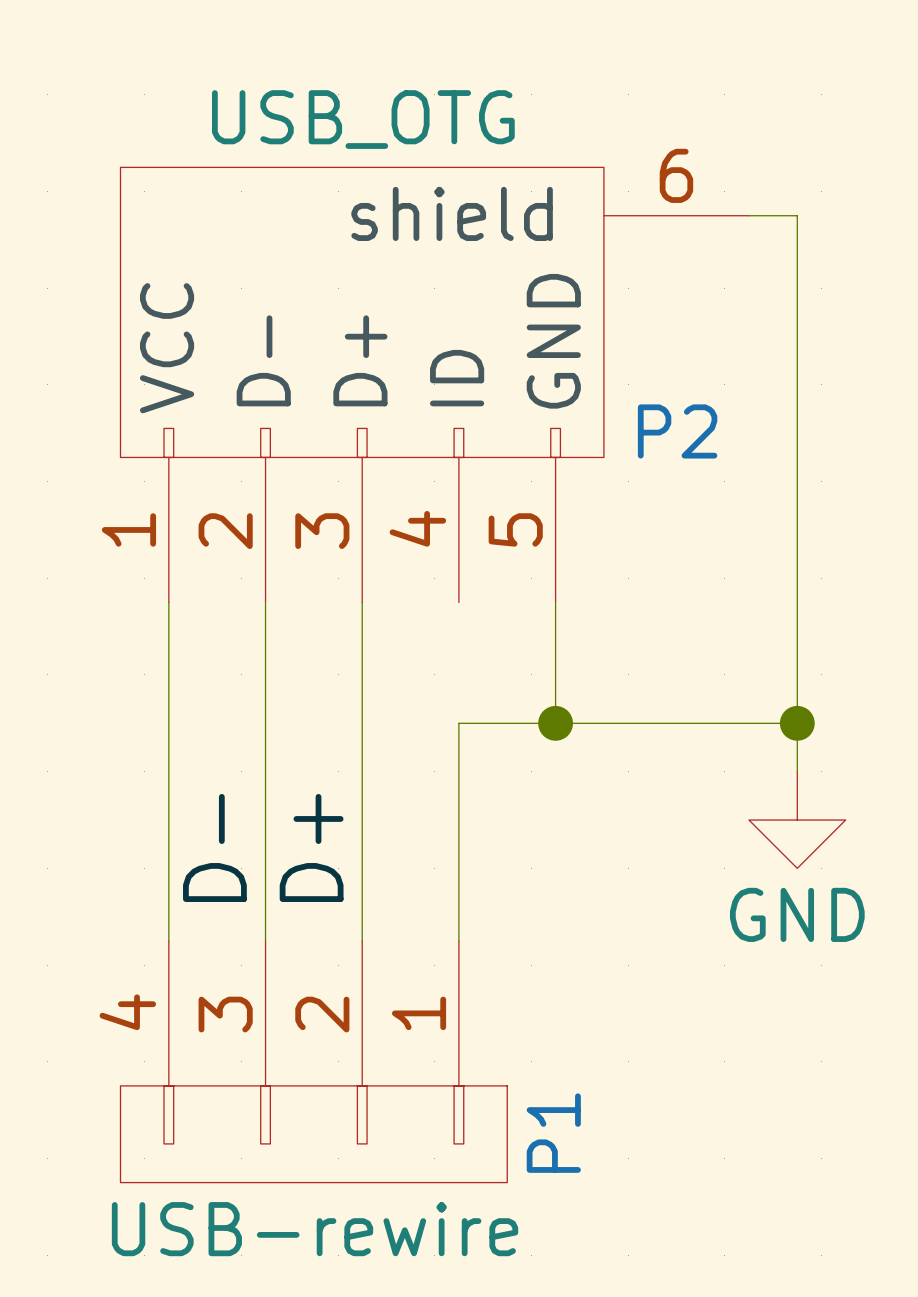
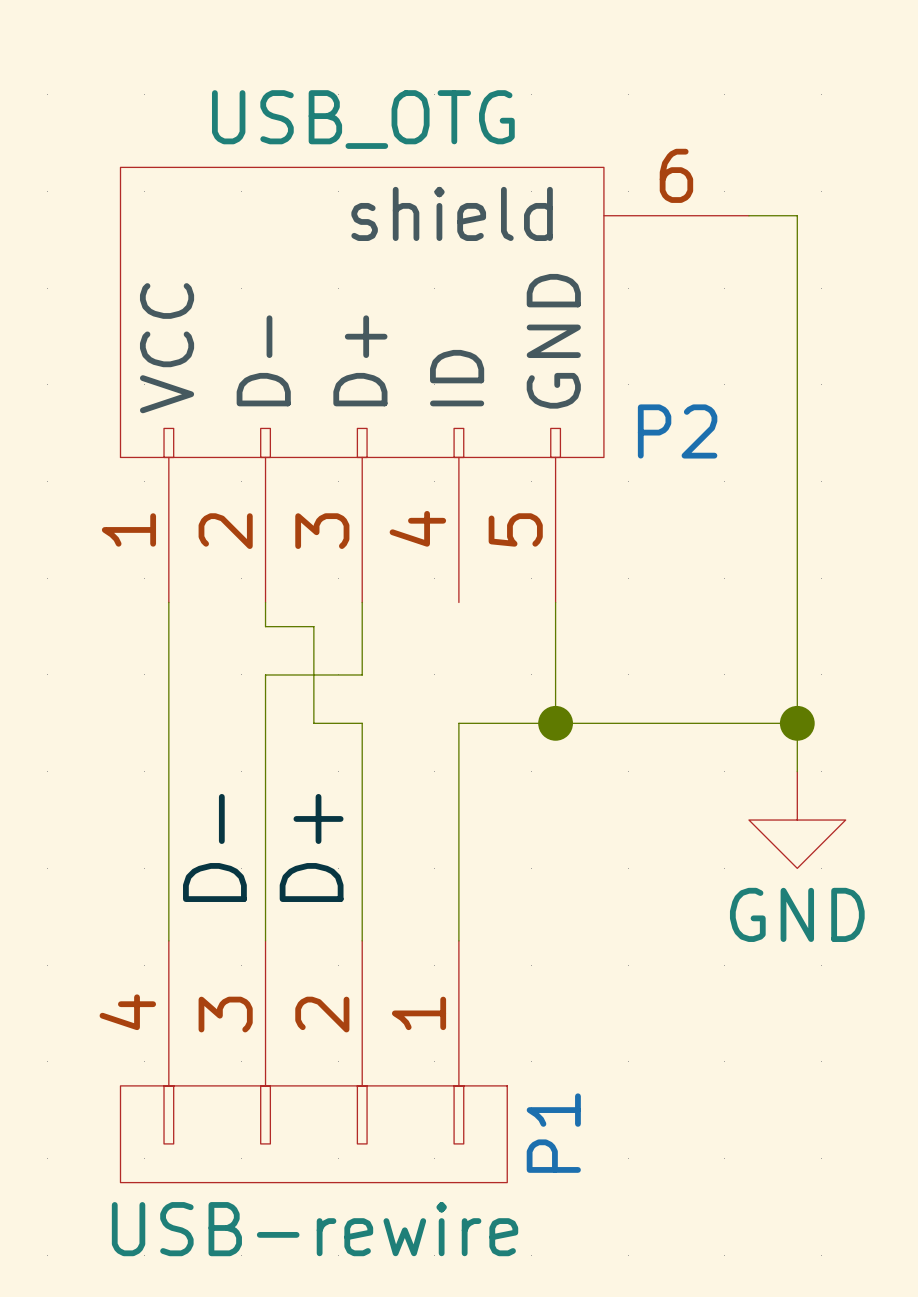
wire: (265, 626) (265, 674) -> (265, 626) (313, 626) (313, 723) (362, 723)
wire: (362, 674) (362, 723) -> (362, 674) (265, 674)

